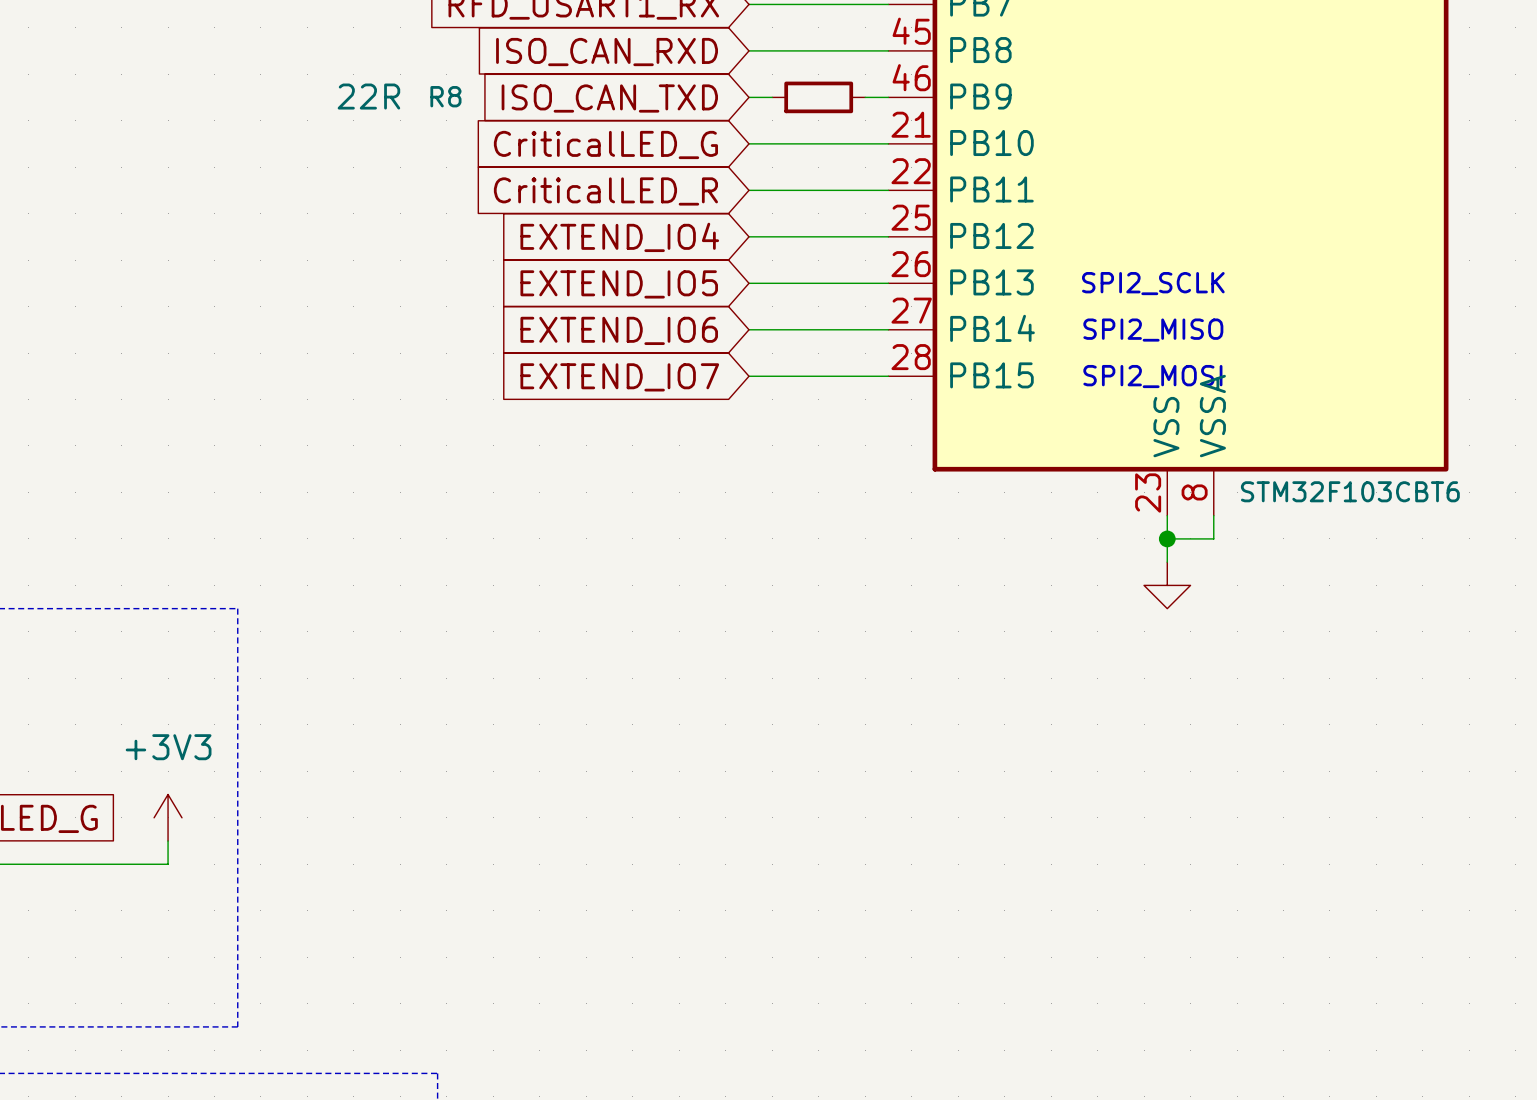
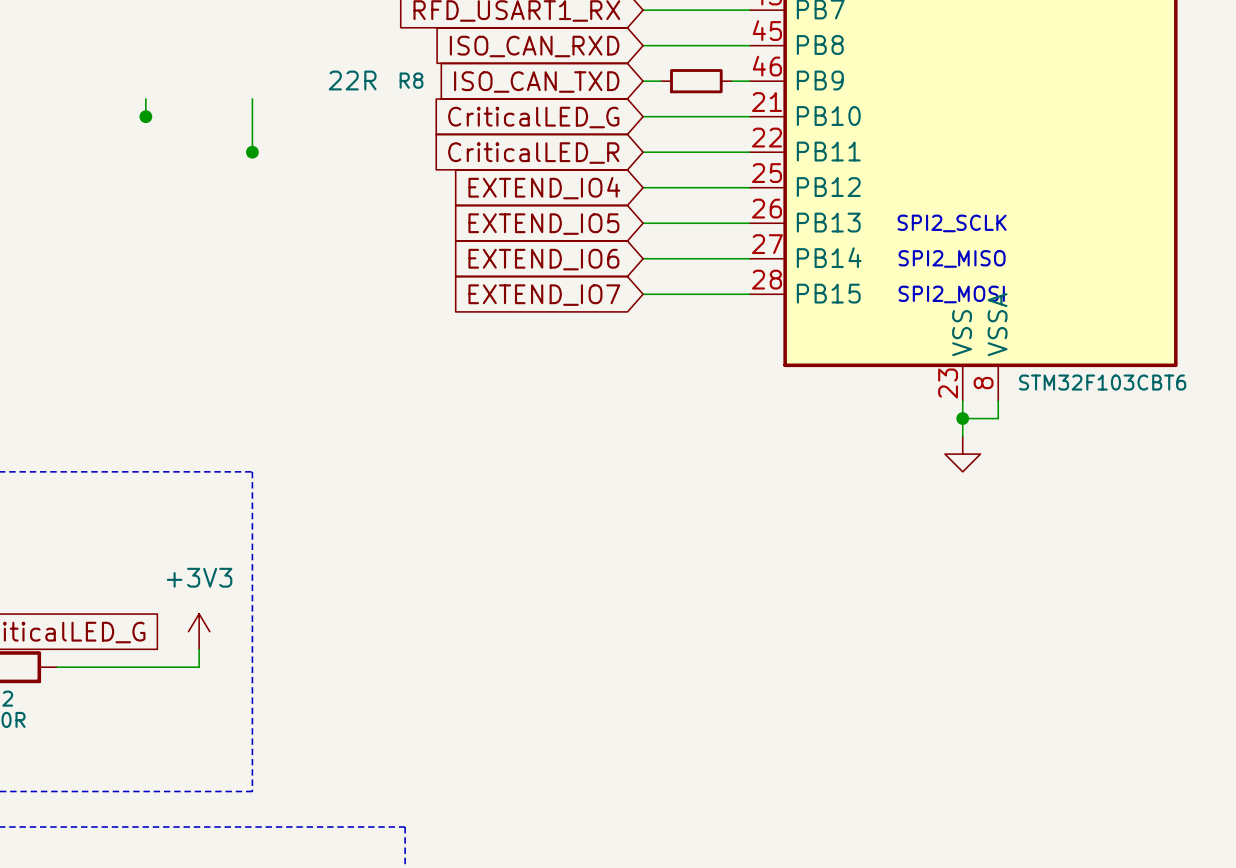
wire: none -> (145, 98) (145, 116)
wire: none -> (252, 98) (252, 152)
junction: none -> (145, 116)
junction: none -> (252, 152)

